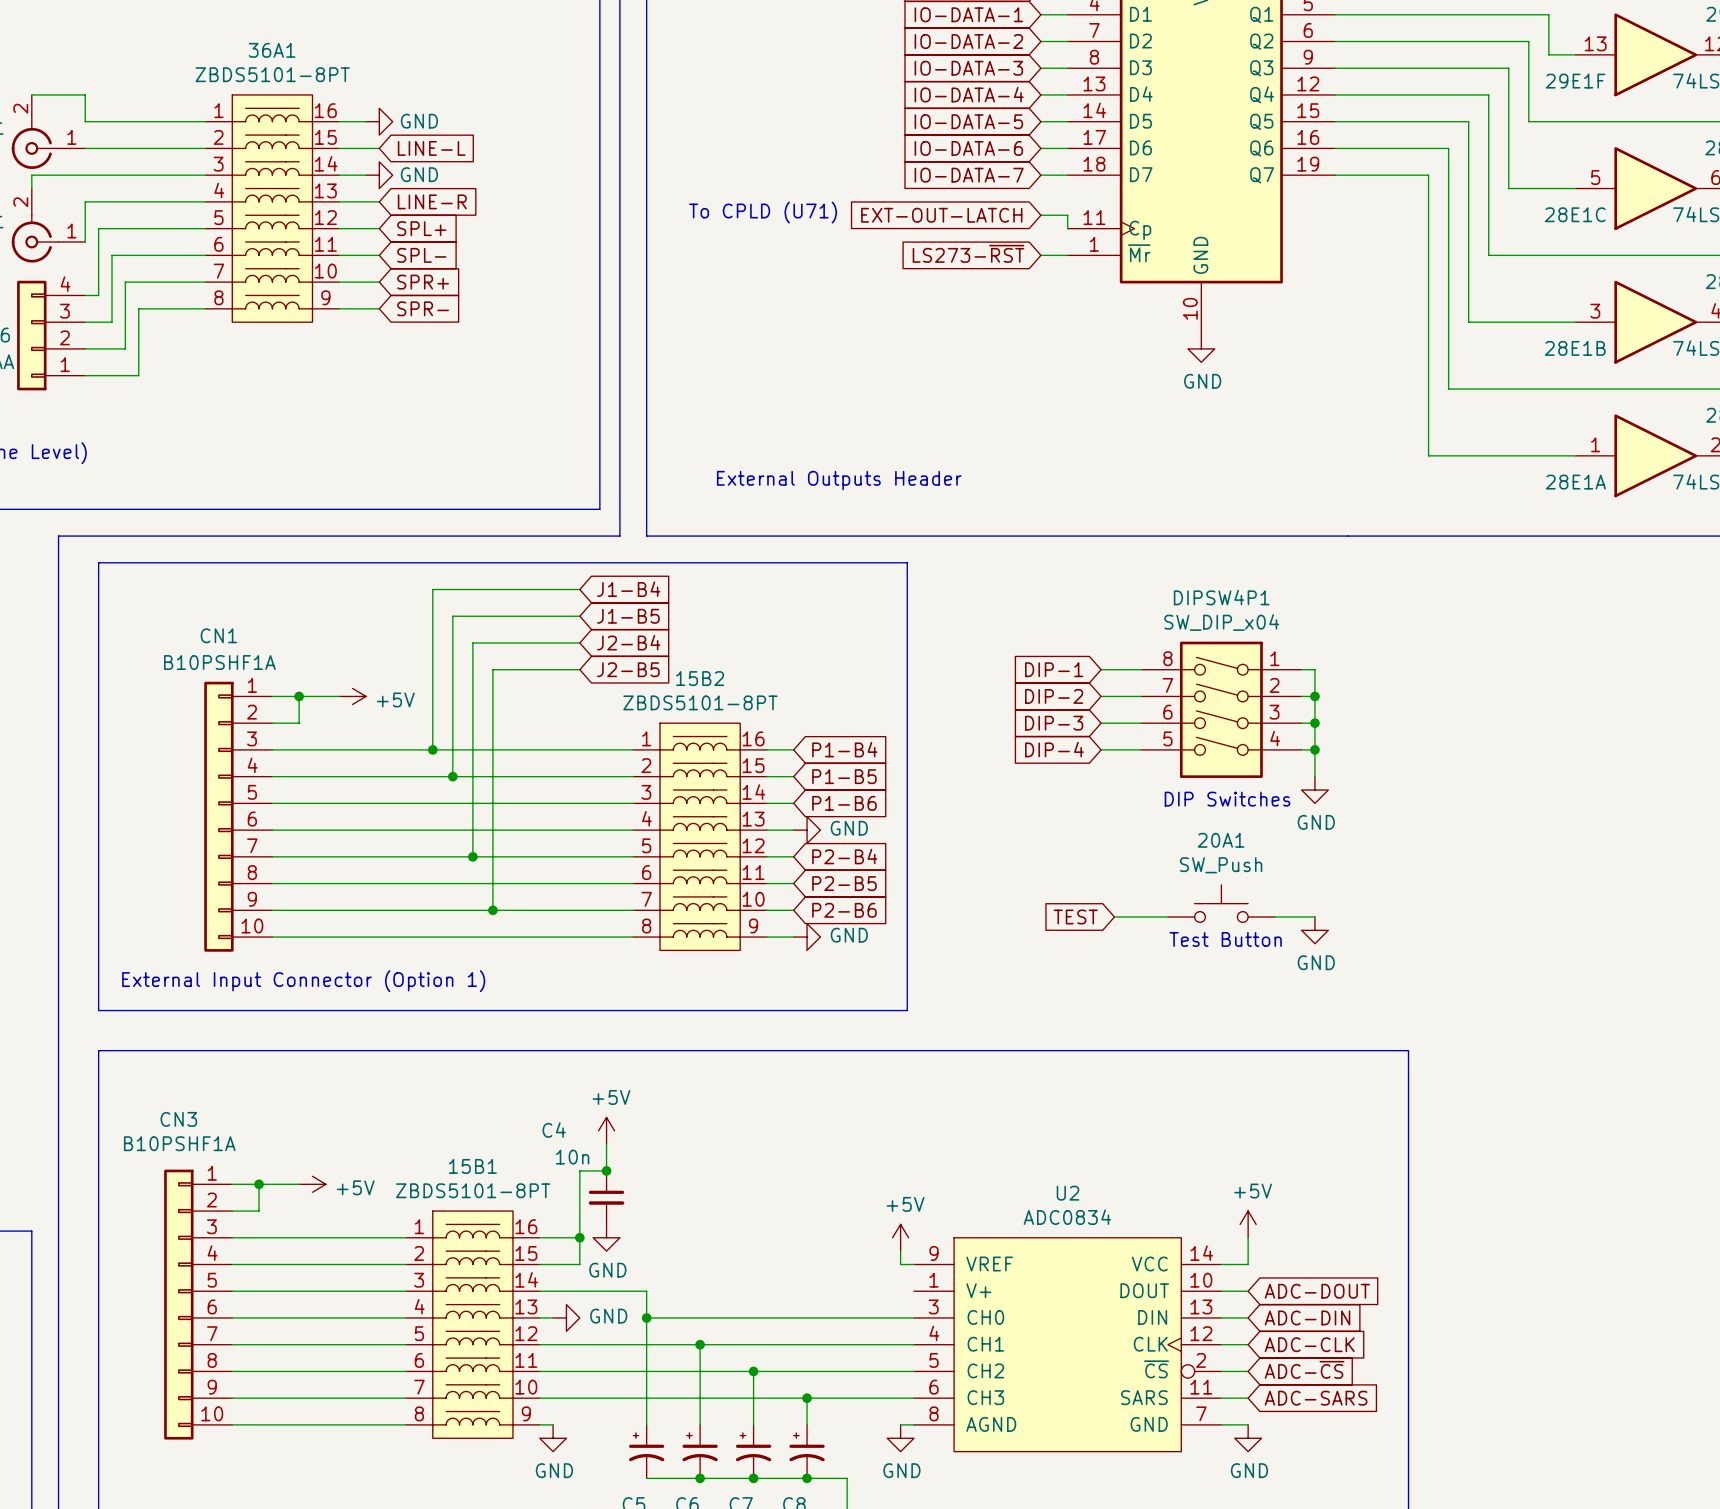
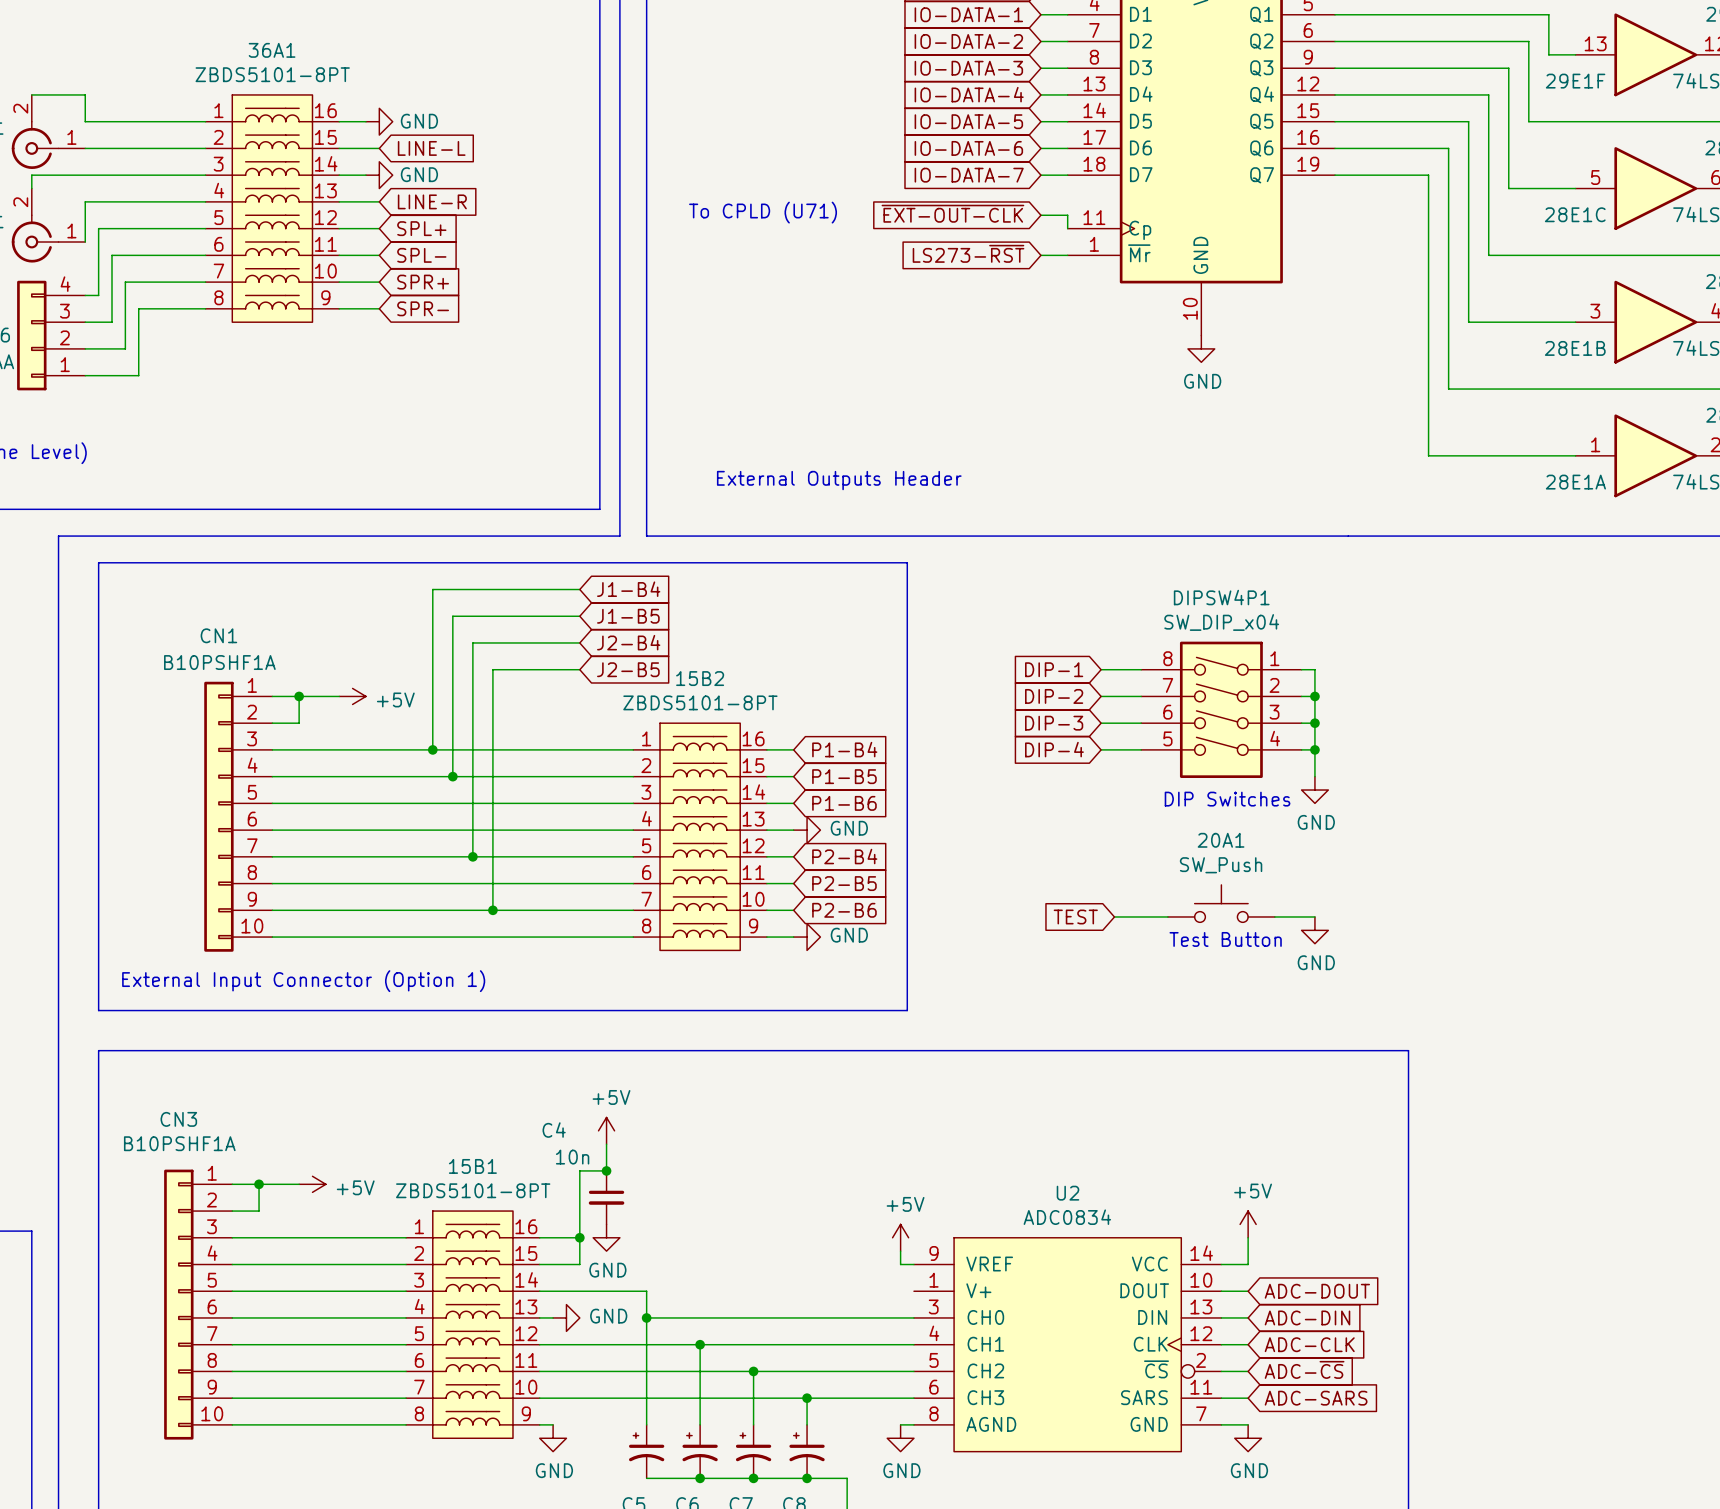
global label: EXT-OUT-LATCH (941, 215) -> ~{EXT-OUT-CLK} (952, 213)

